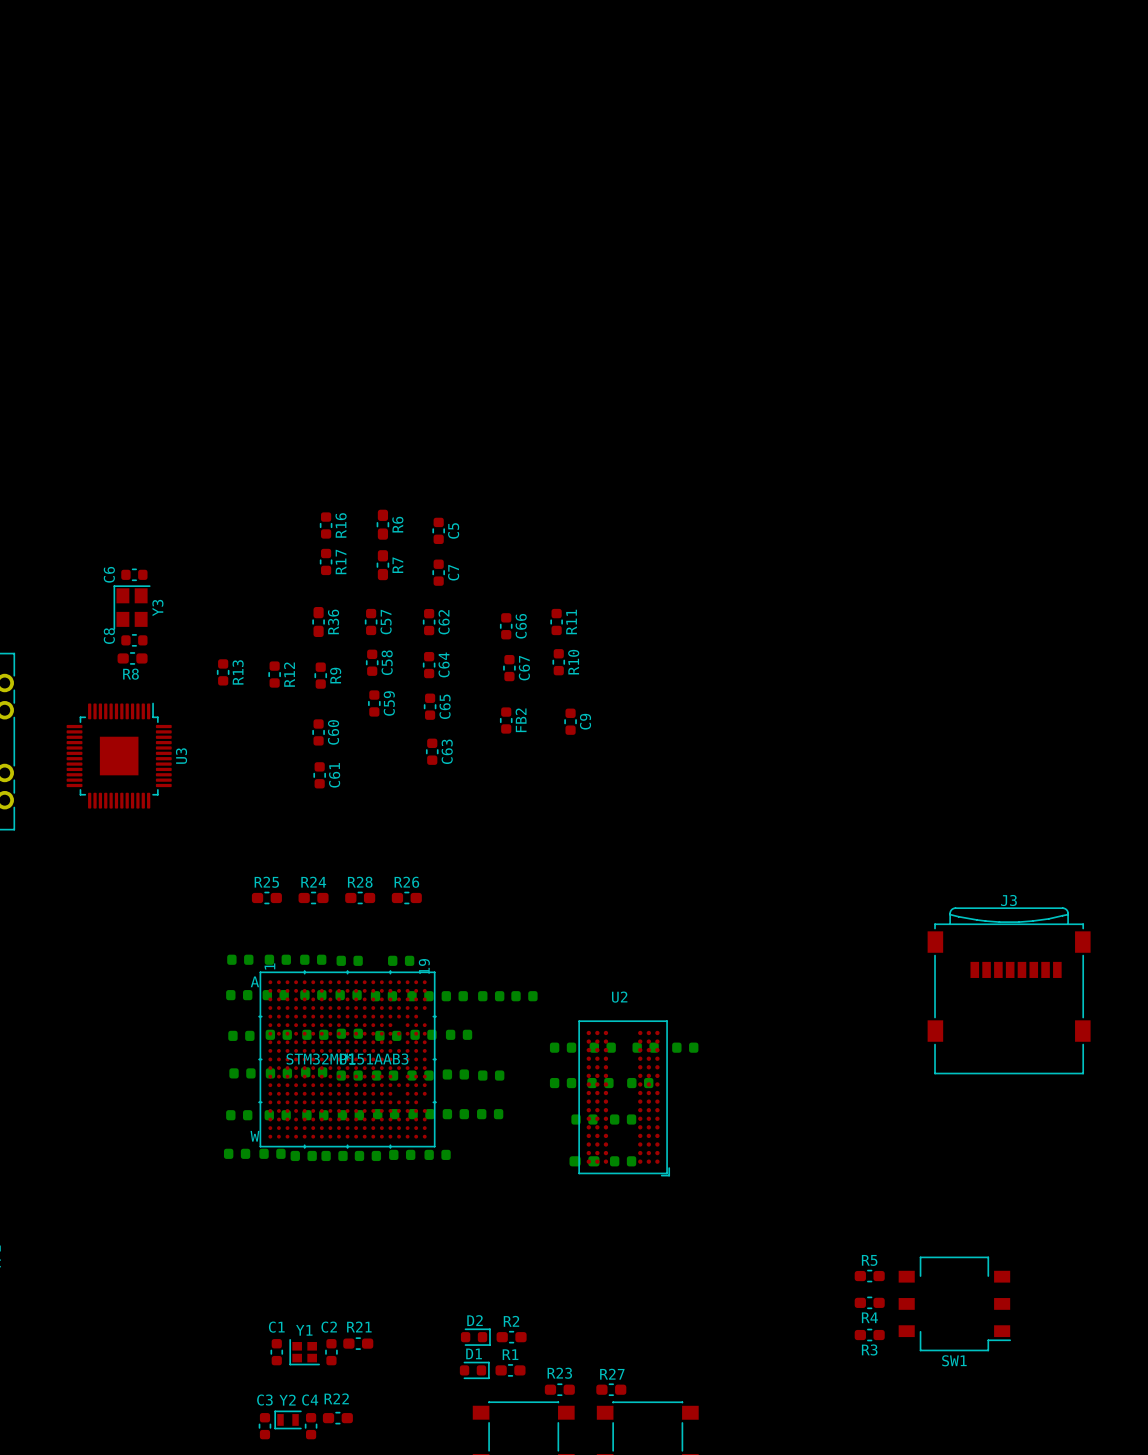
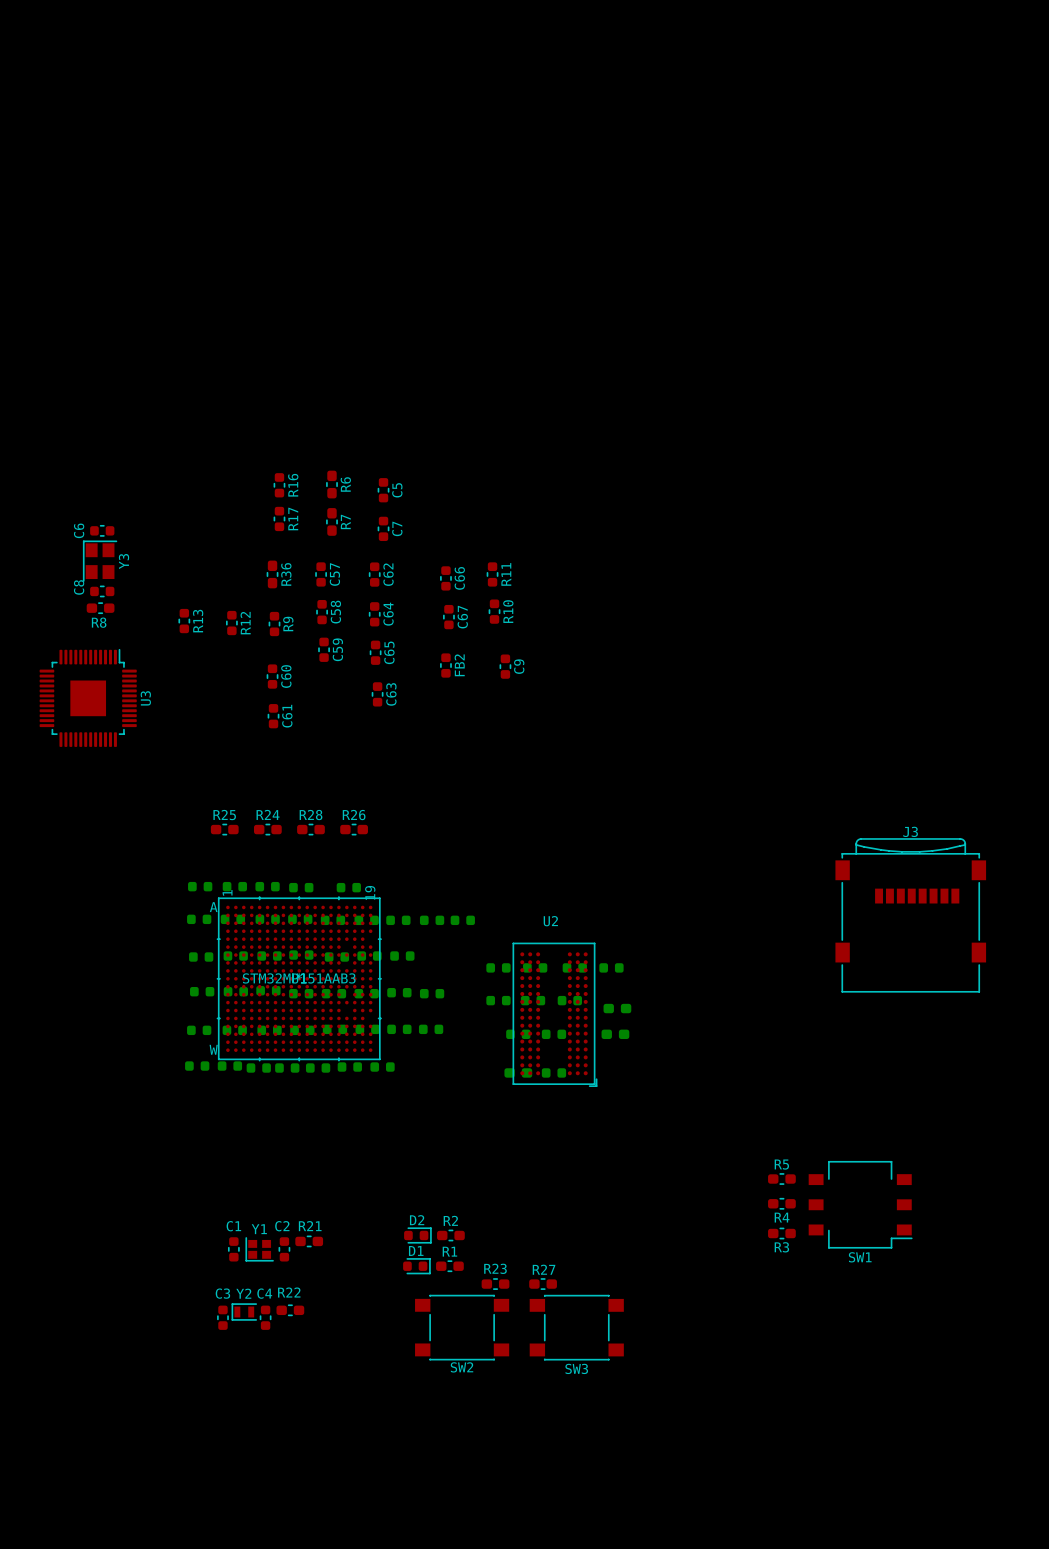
part: none -> (617, 1008)
part: none -> (615, 1034)

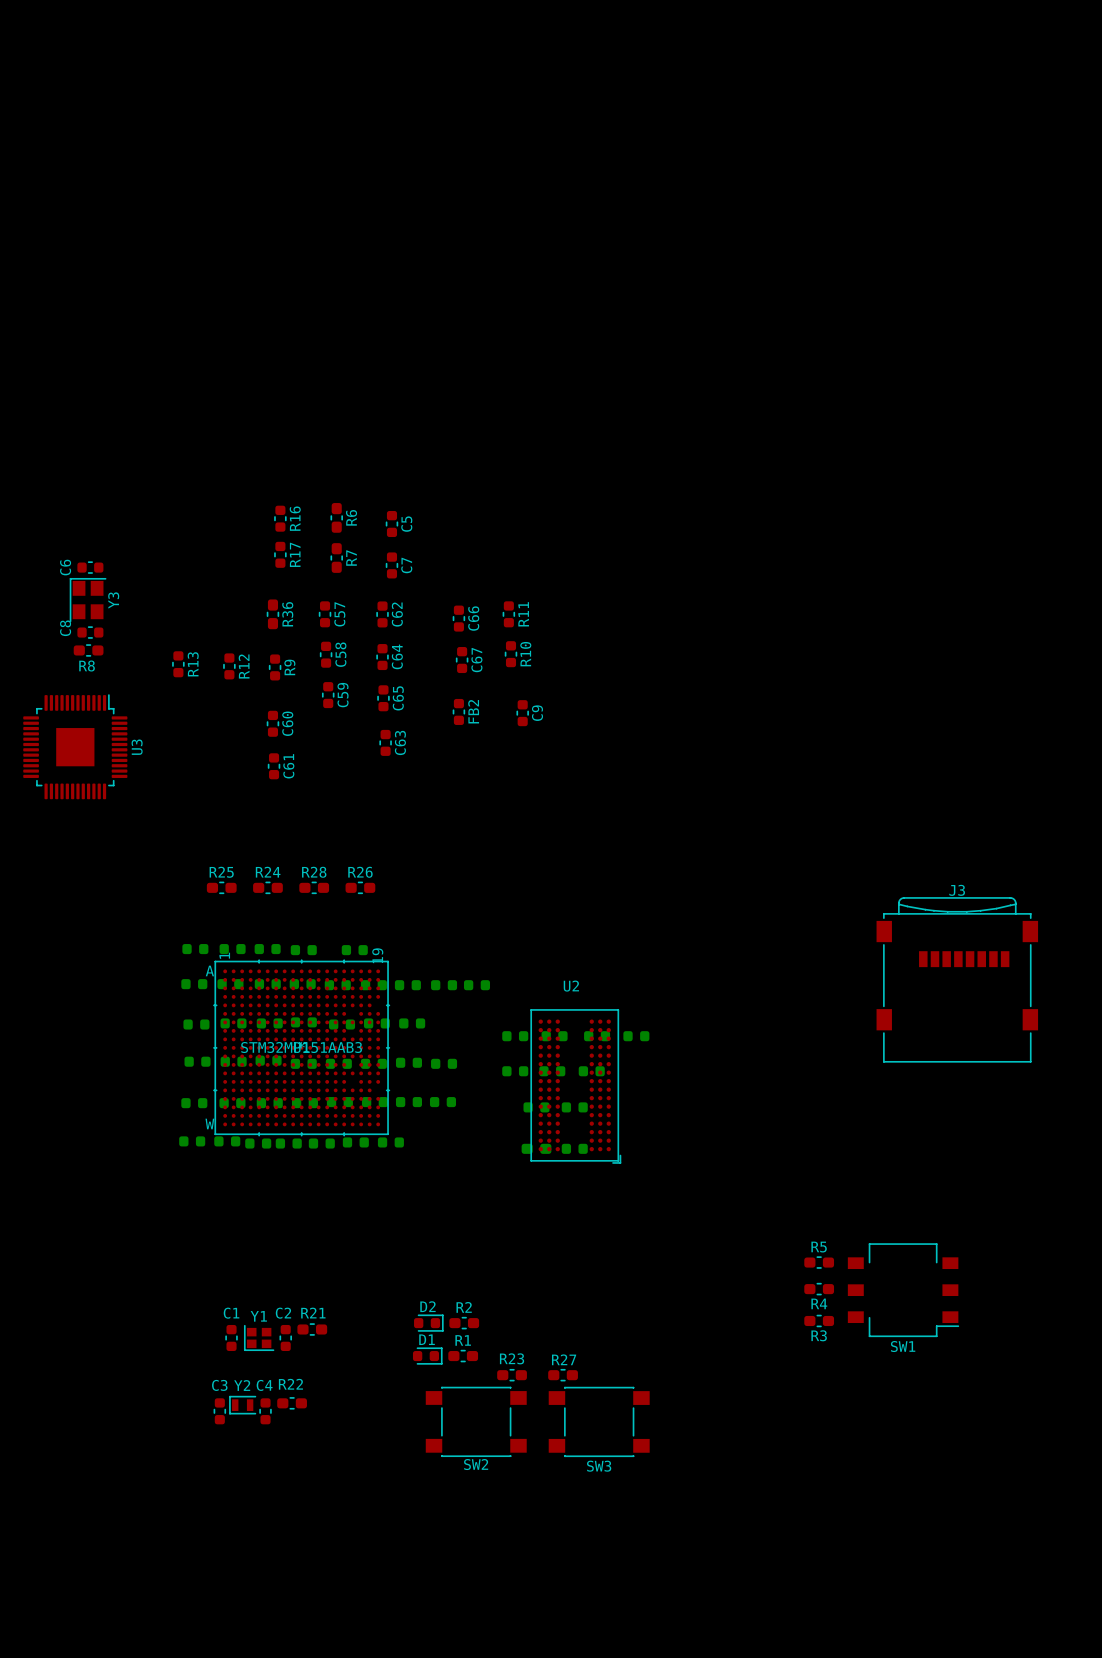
part: (617, 1008) -> none
part: (615, 1034) -> none

